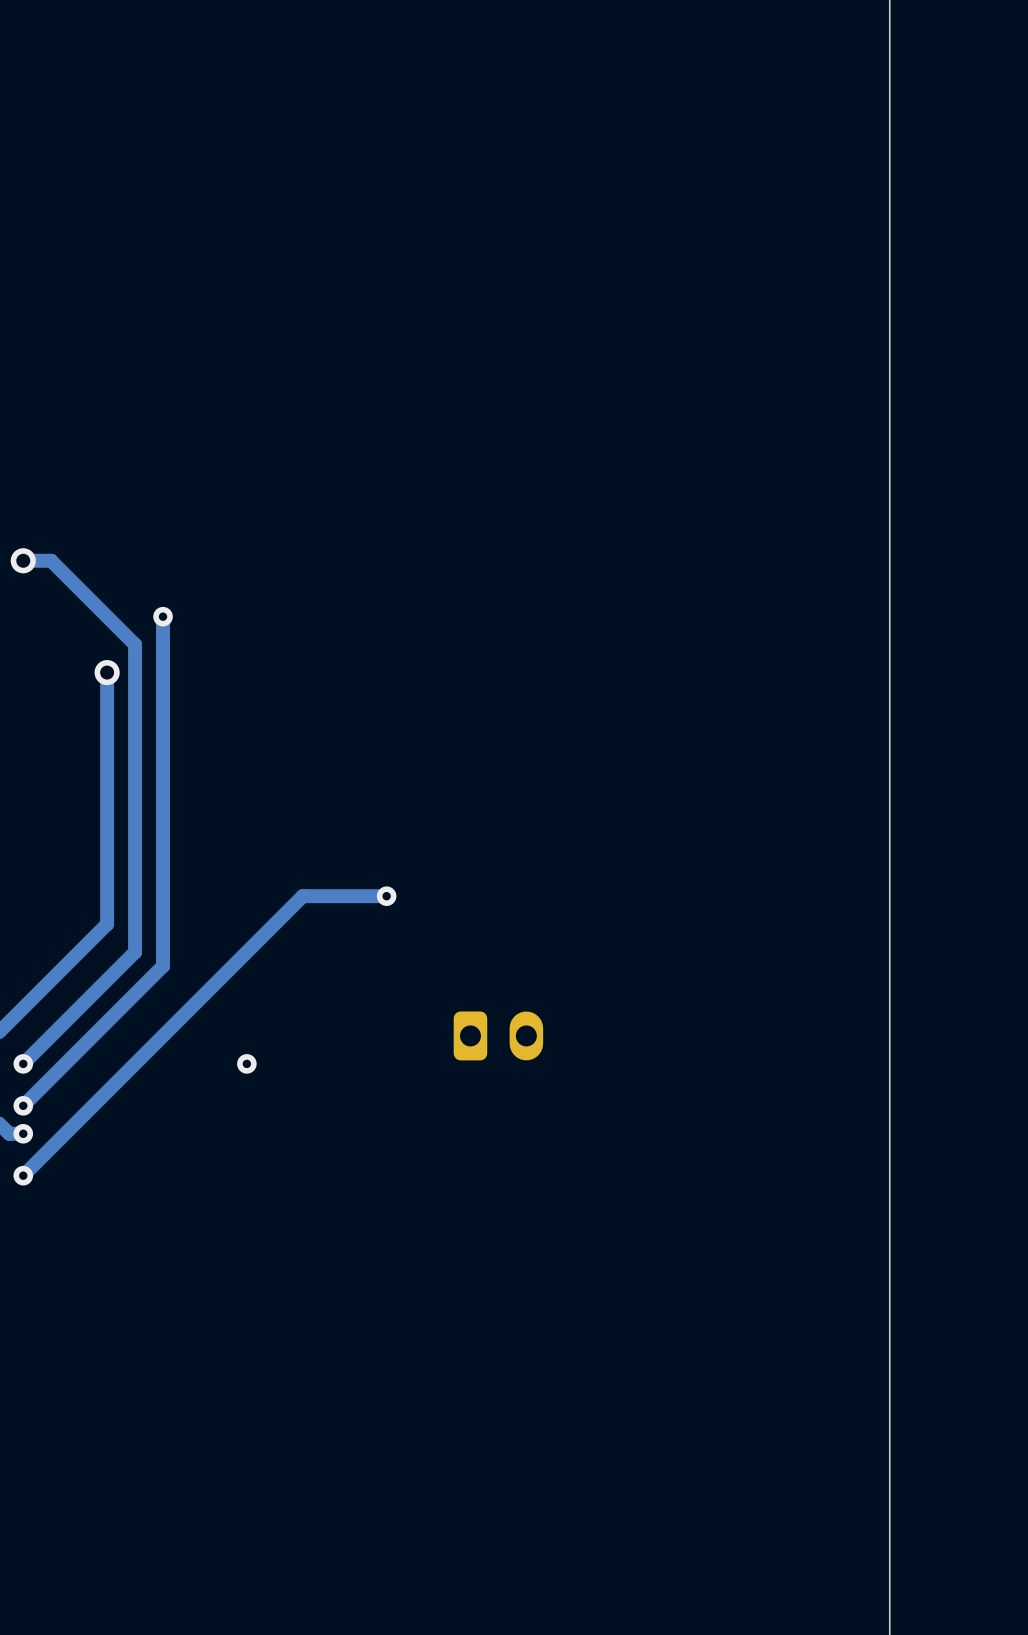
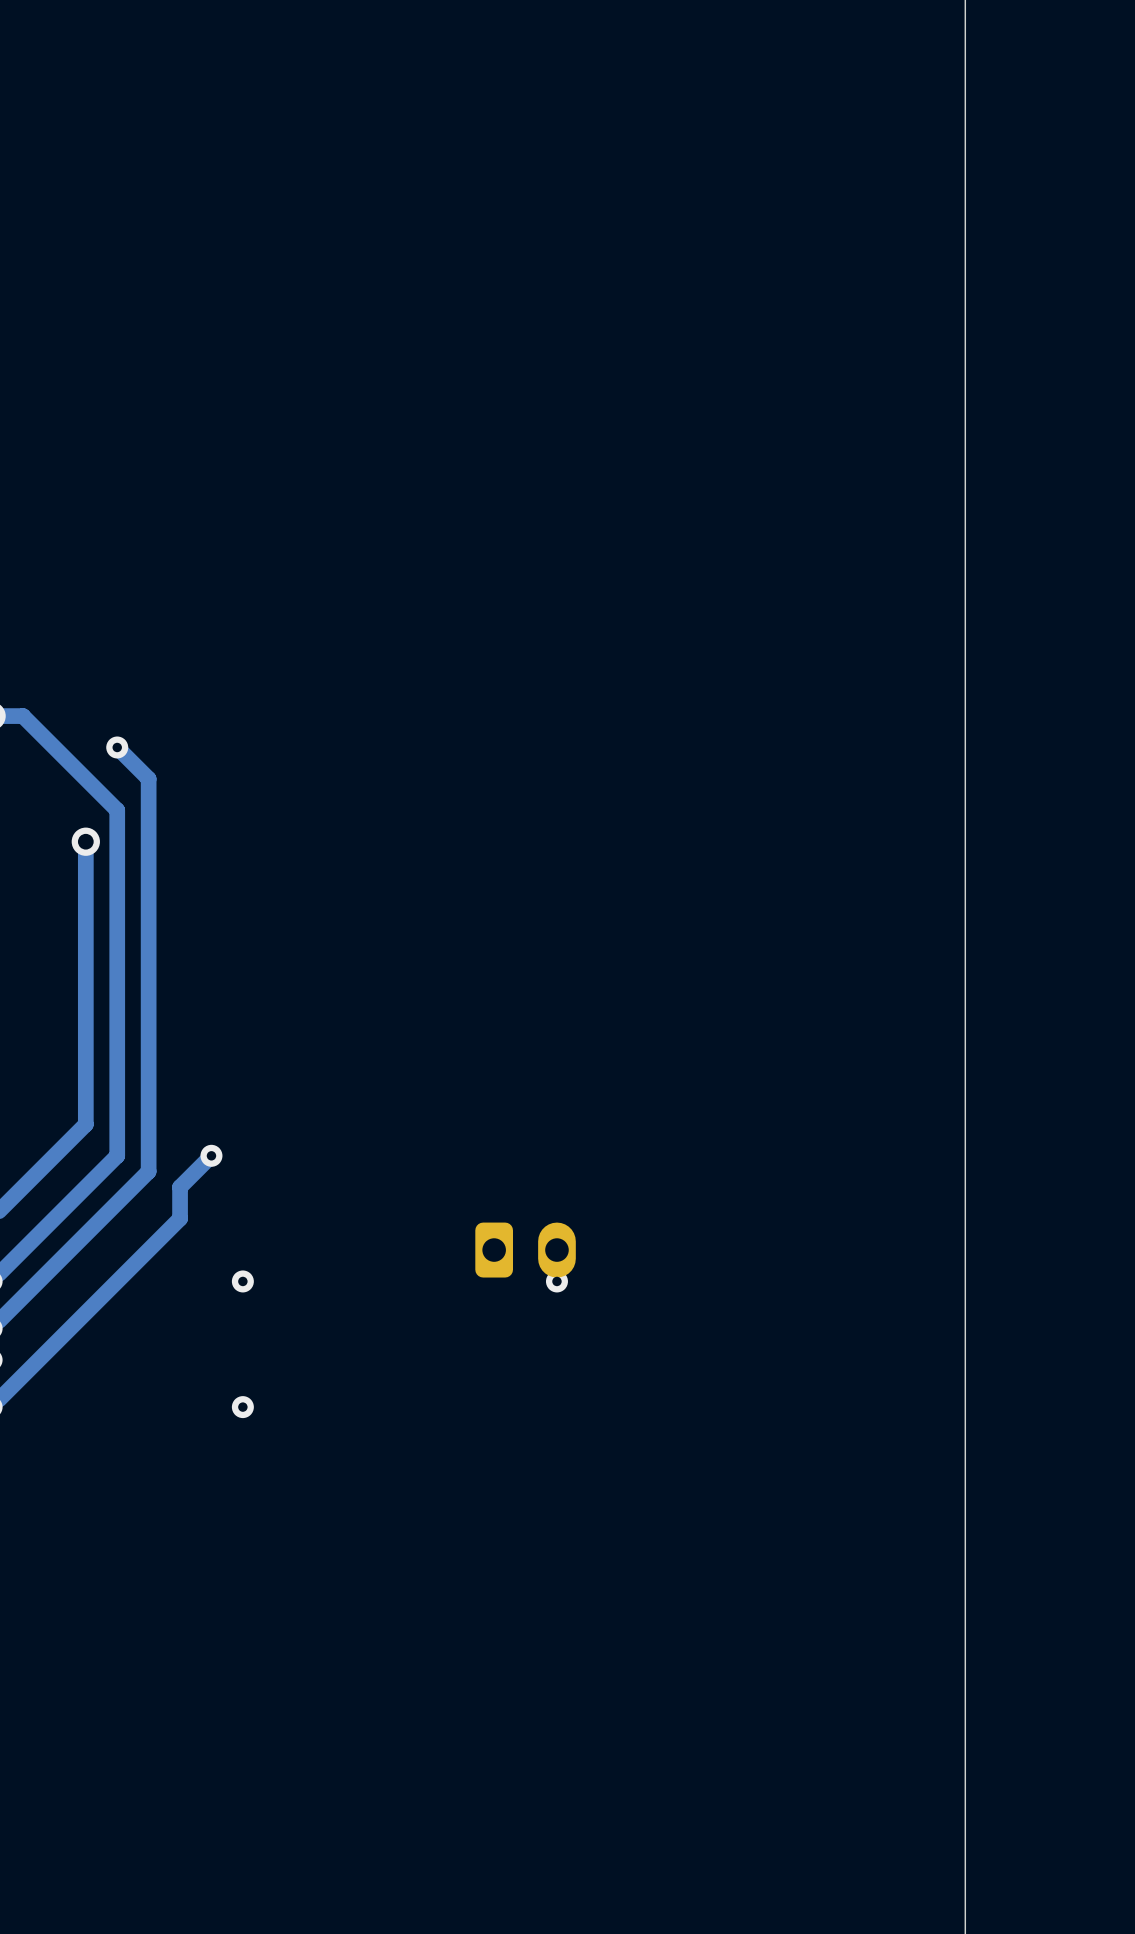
track: none -> (117, 747) (148, 778)
via position: (163, 616) -> (117, 747)
track: (386, 896) (302, 896) (190, 1007) -> (211, 1155) (180, 1187) (180, 1218)
via: (386, 896) -> none
via: none -> (211, 1155)
via: none -> (556, 1281)
via: none -> (242, 1407)

